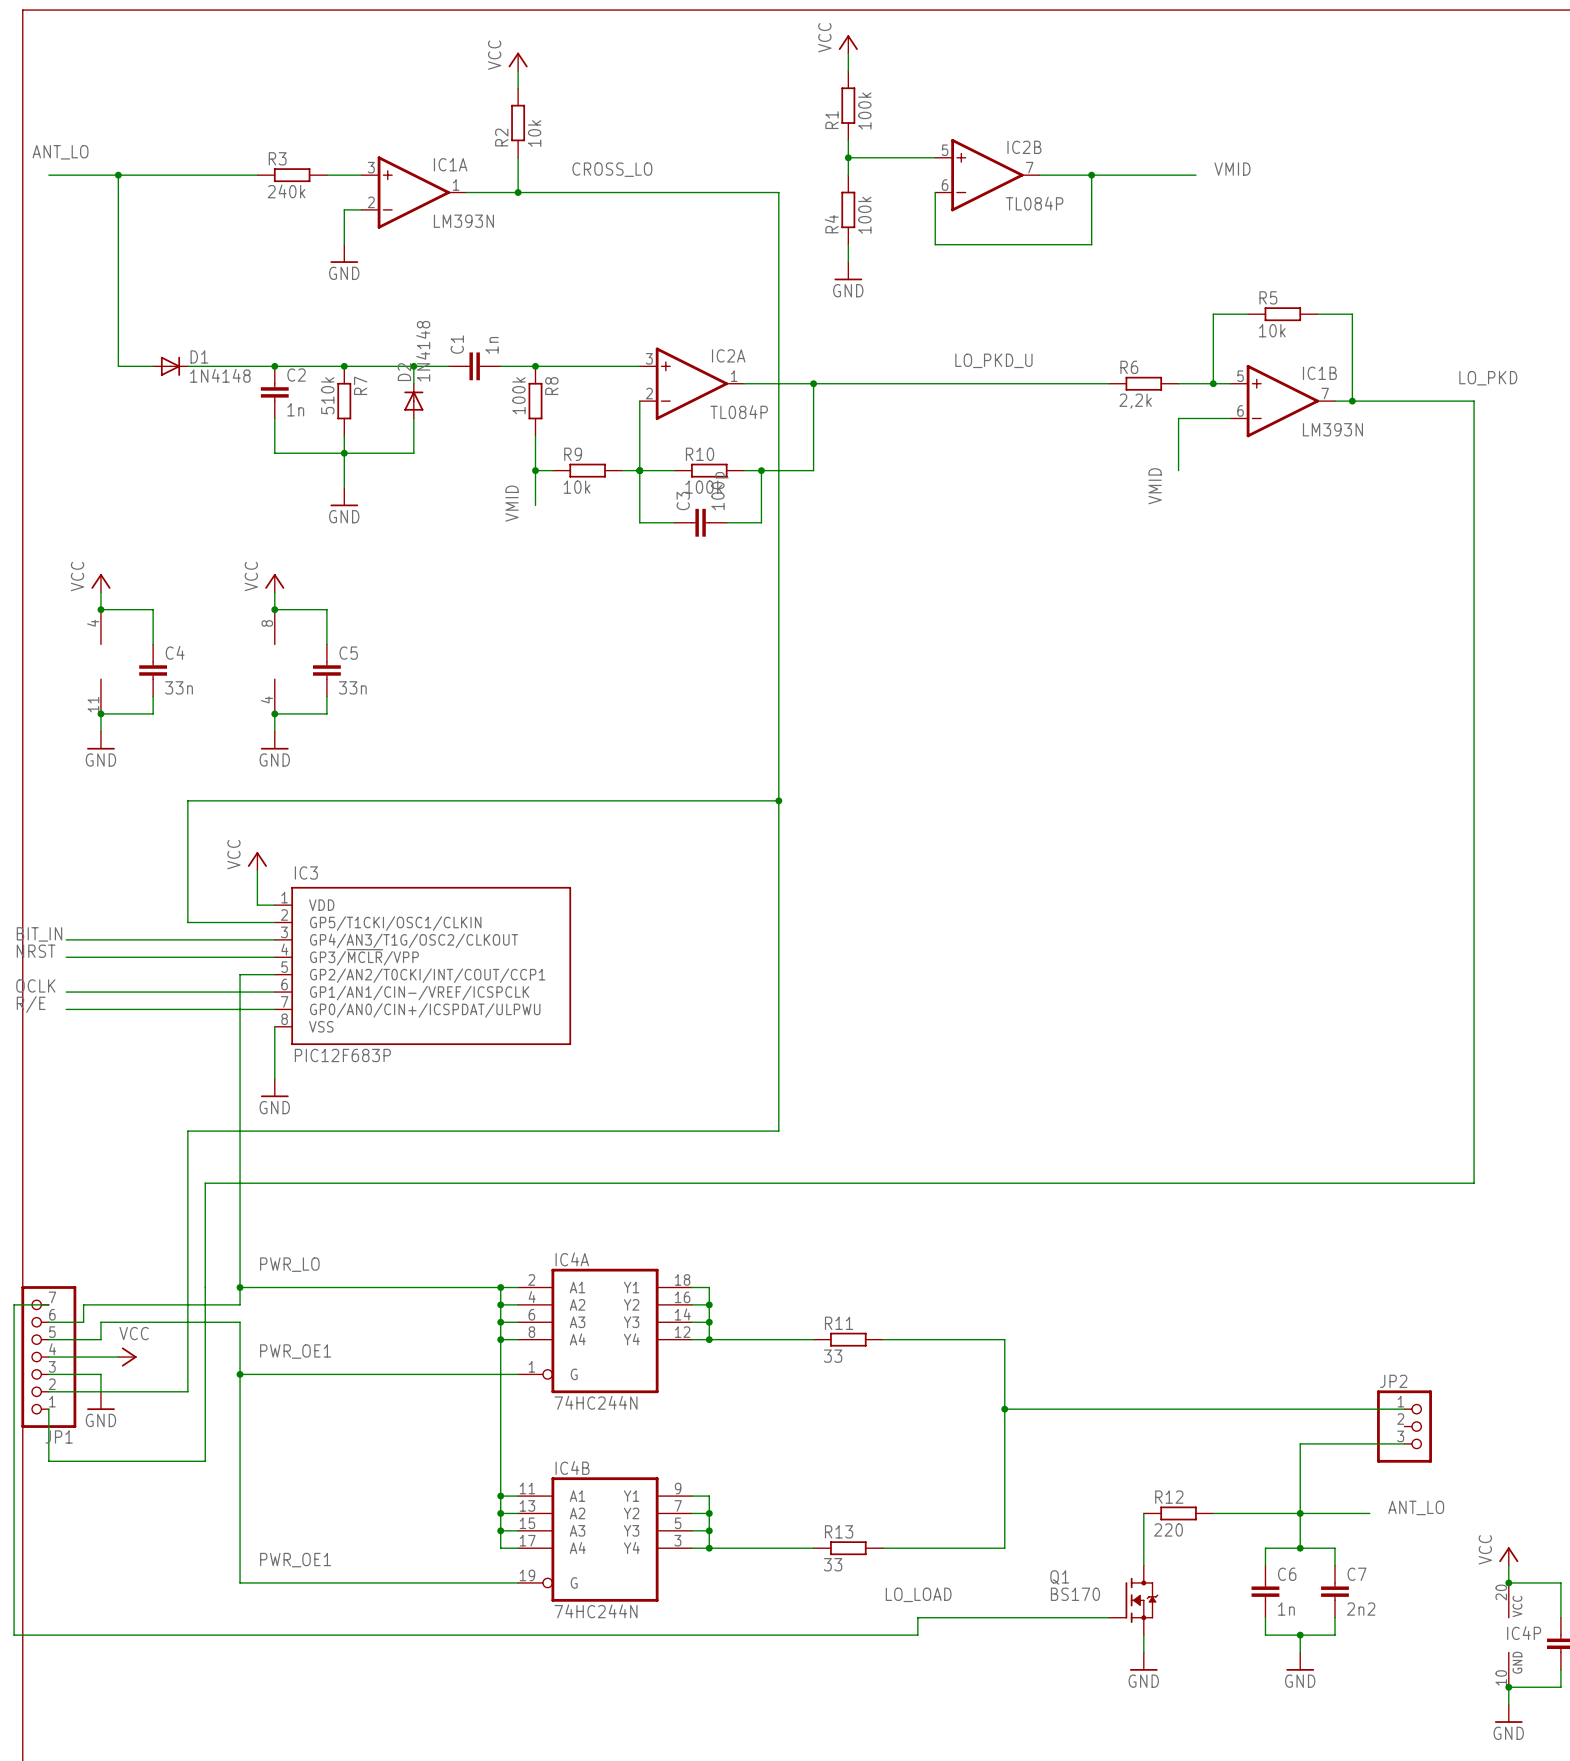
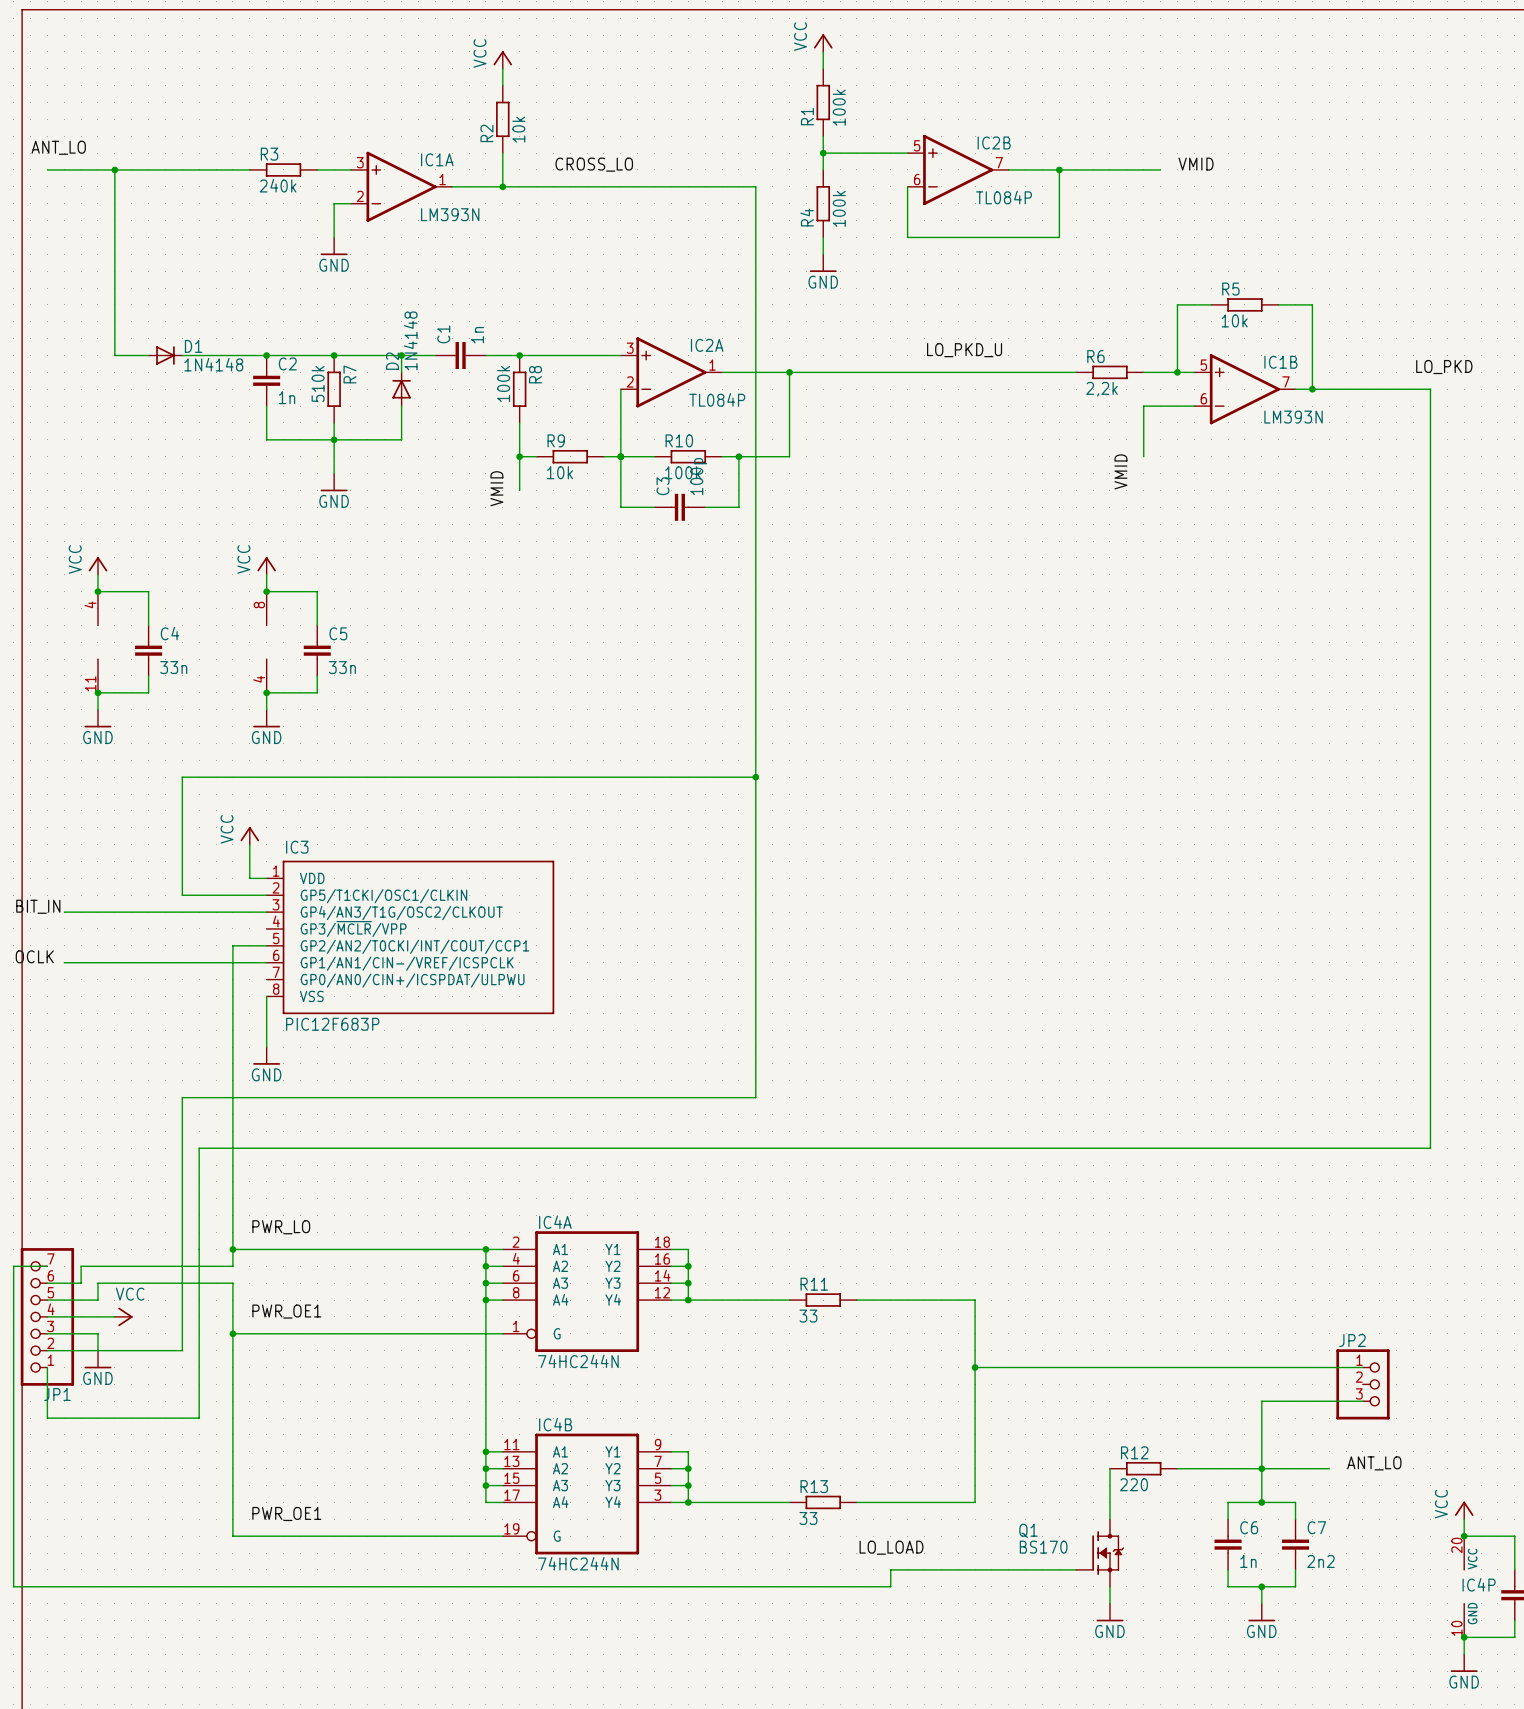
label: NRST (36, 951) -> none
wire: (66, 957) (274, 957) -> none
label: R/E (31, 1004) -> none
wire: (66, 1009) (274, 1009) -> none

